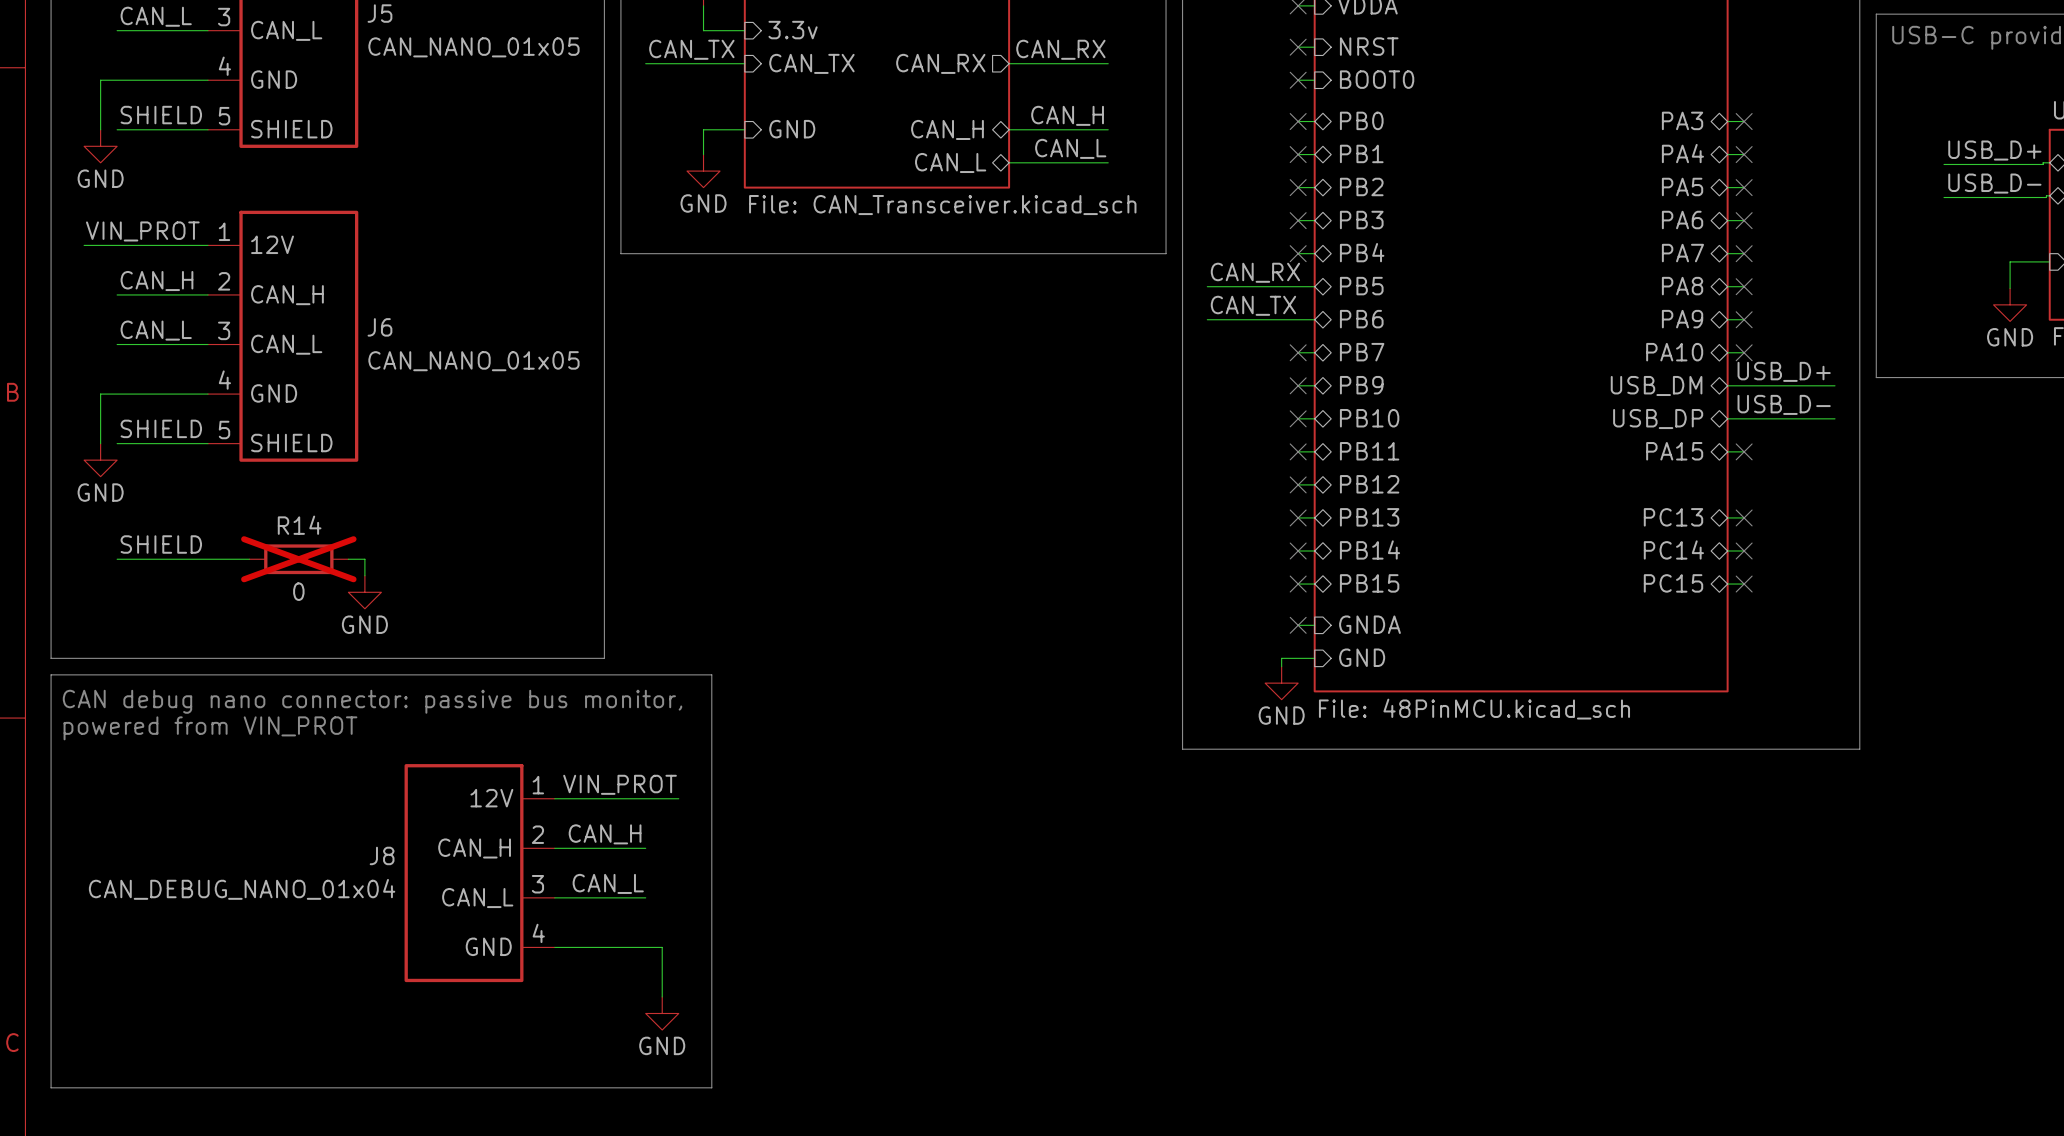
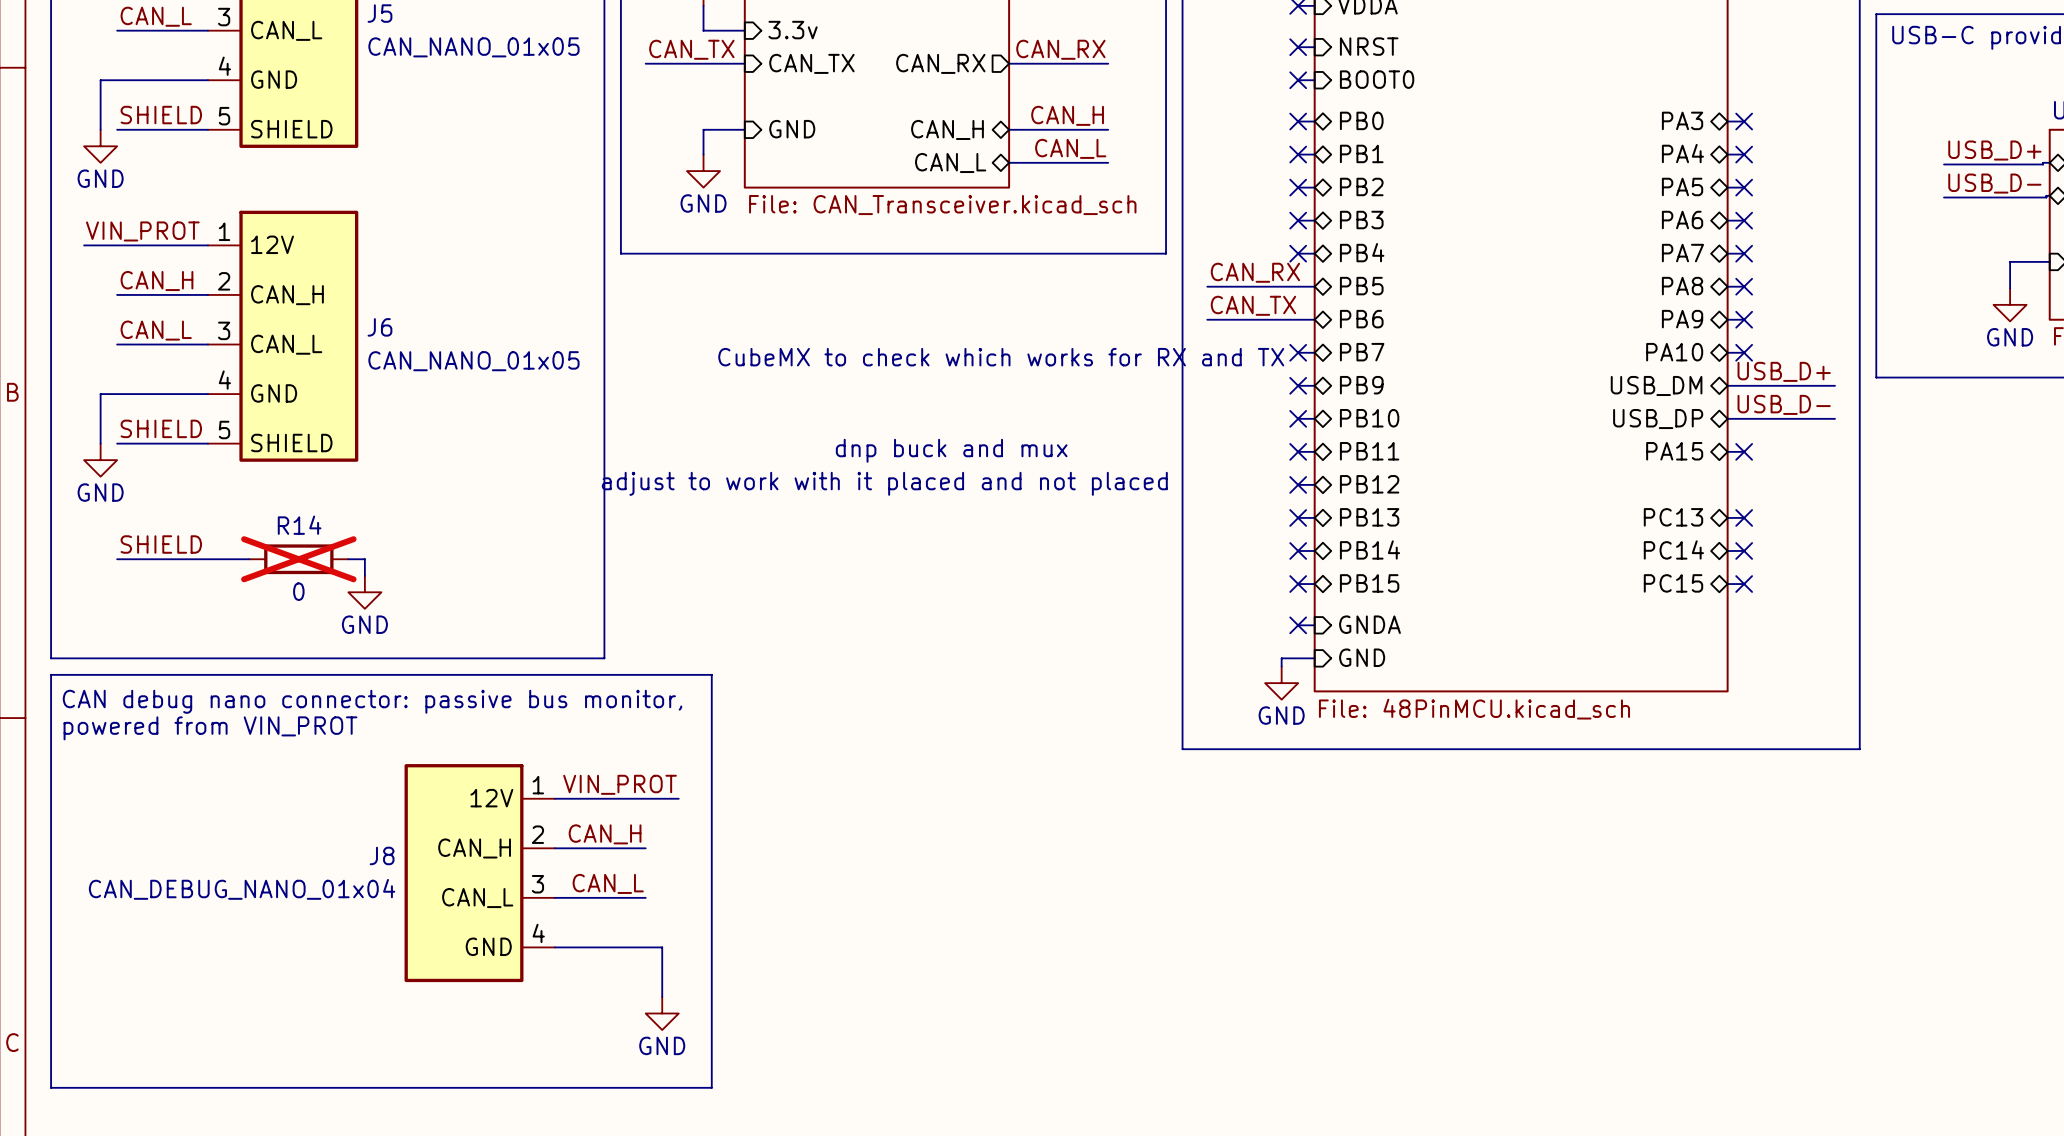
text: none -> CubeMX to check which works for RX and TX (1001, 357)
text: none -> dnp buck and mux (951, 450)
text: none -> adjust to work with it placed and not placed (884, 483)

